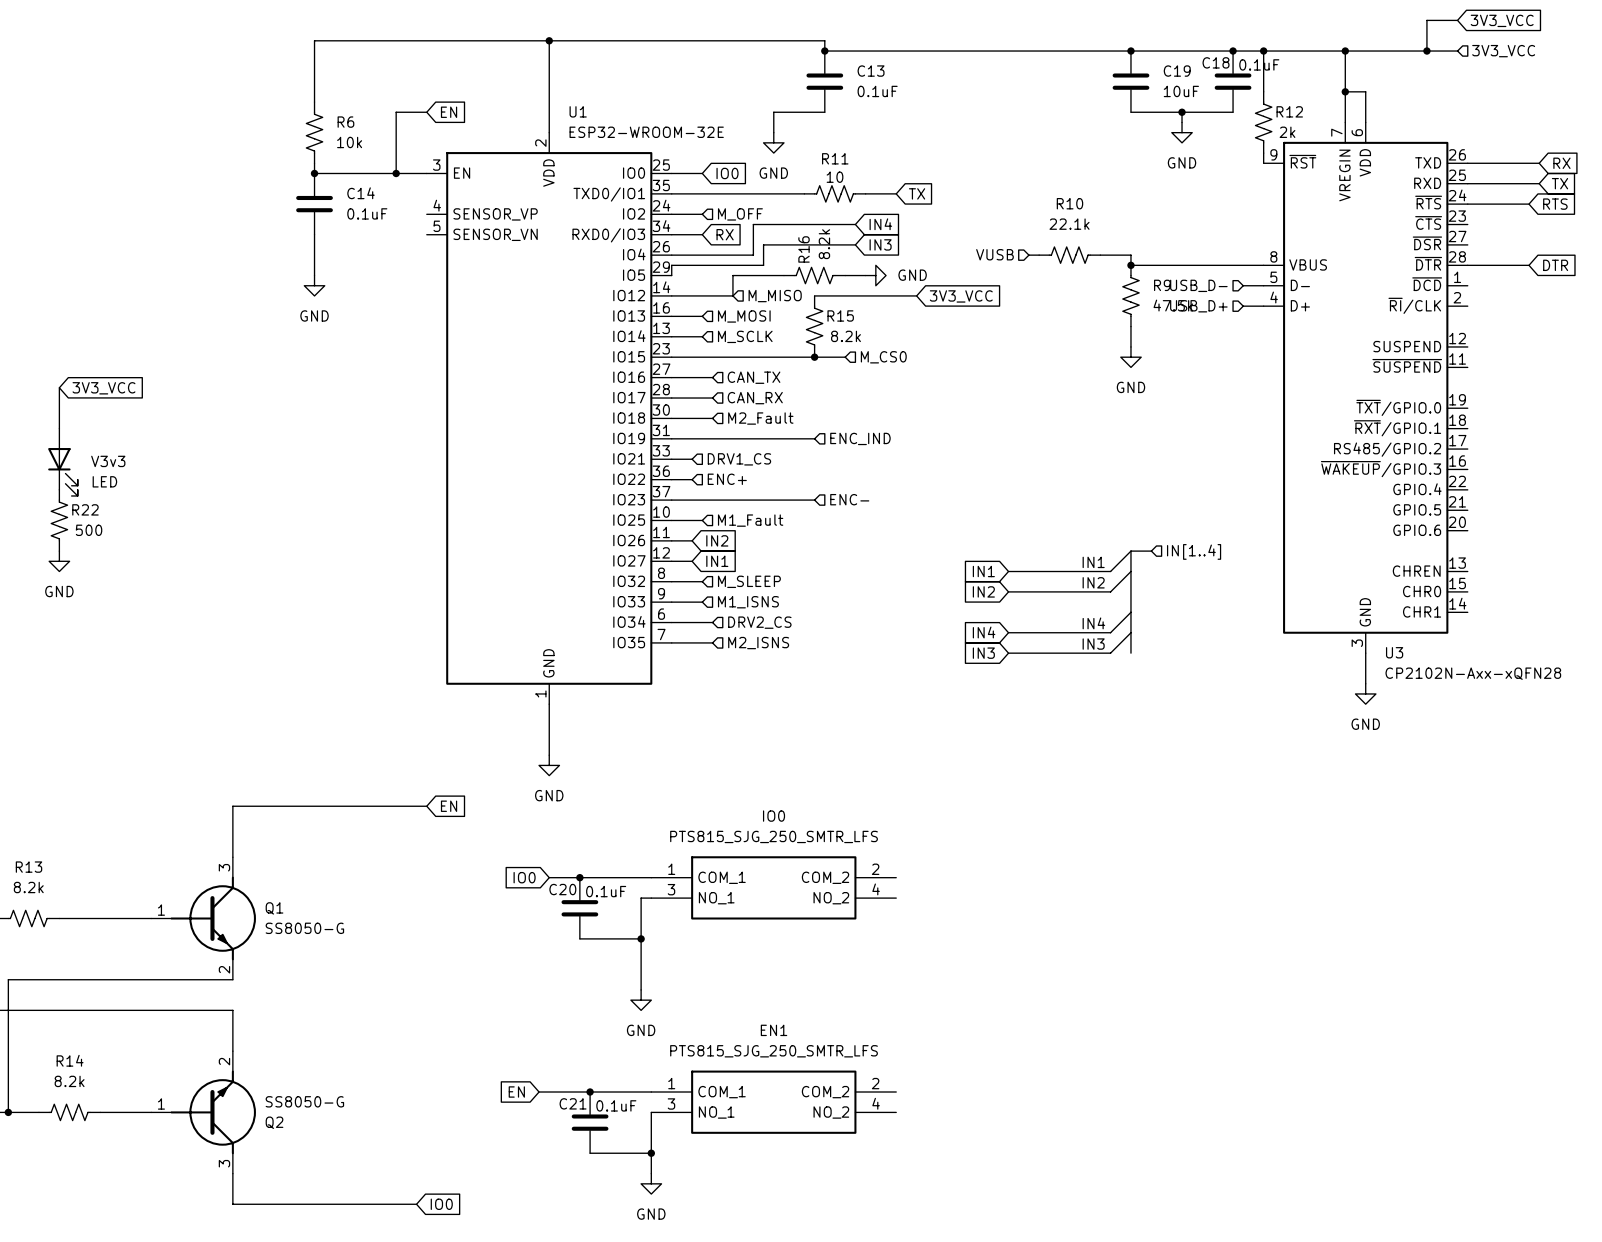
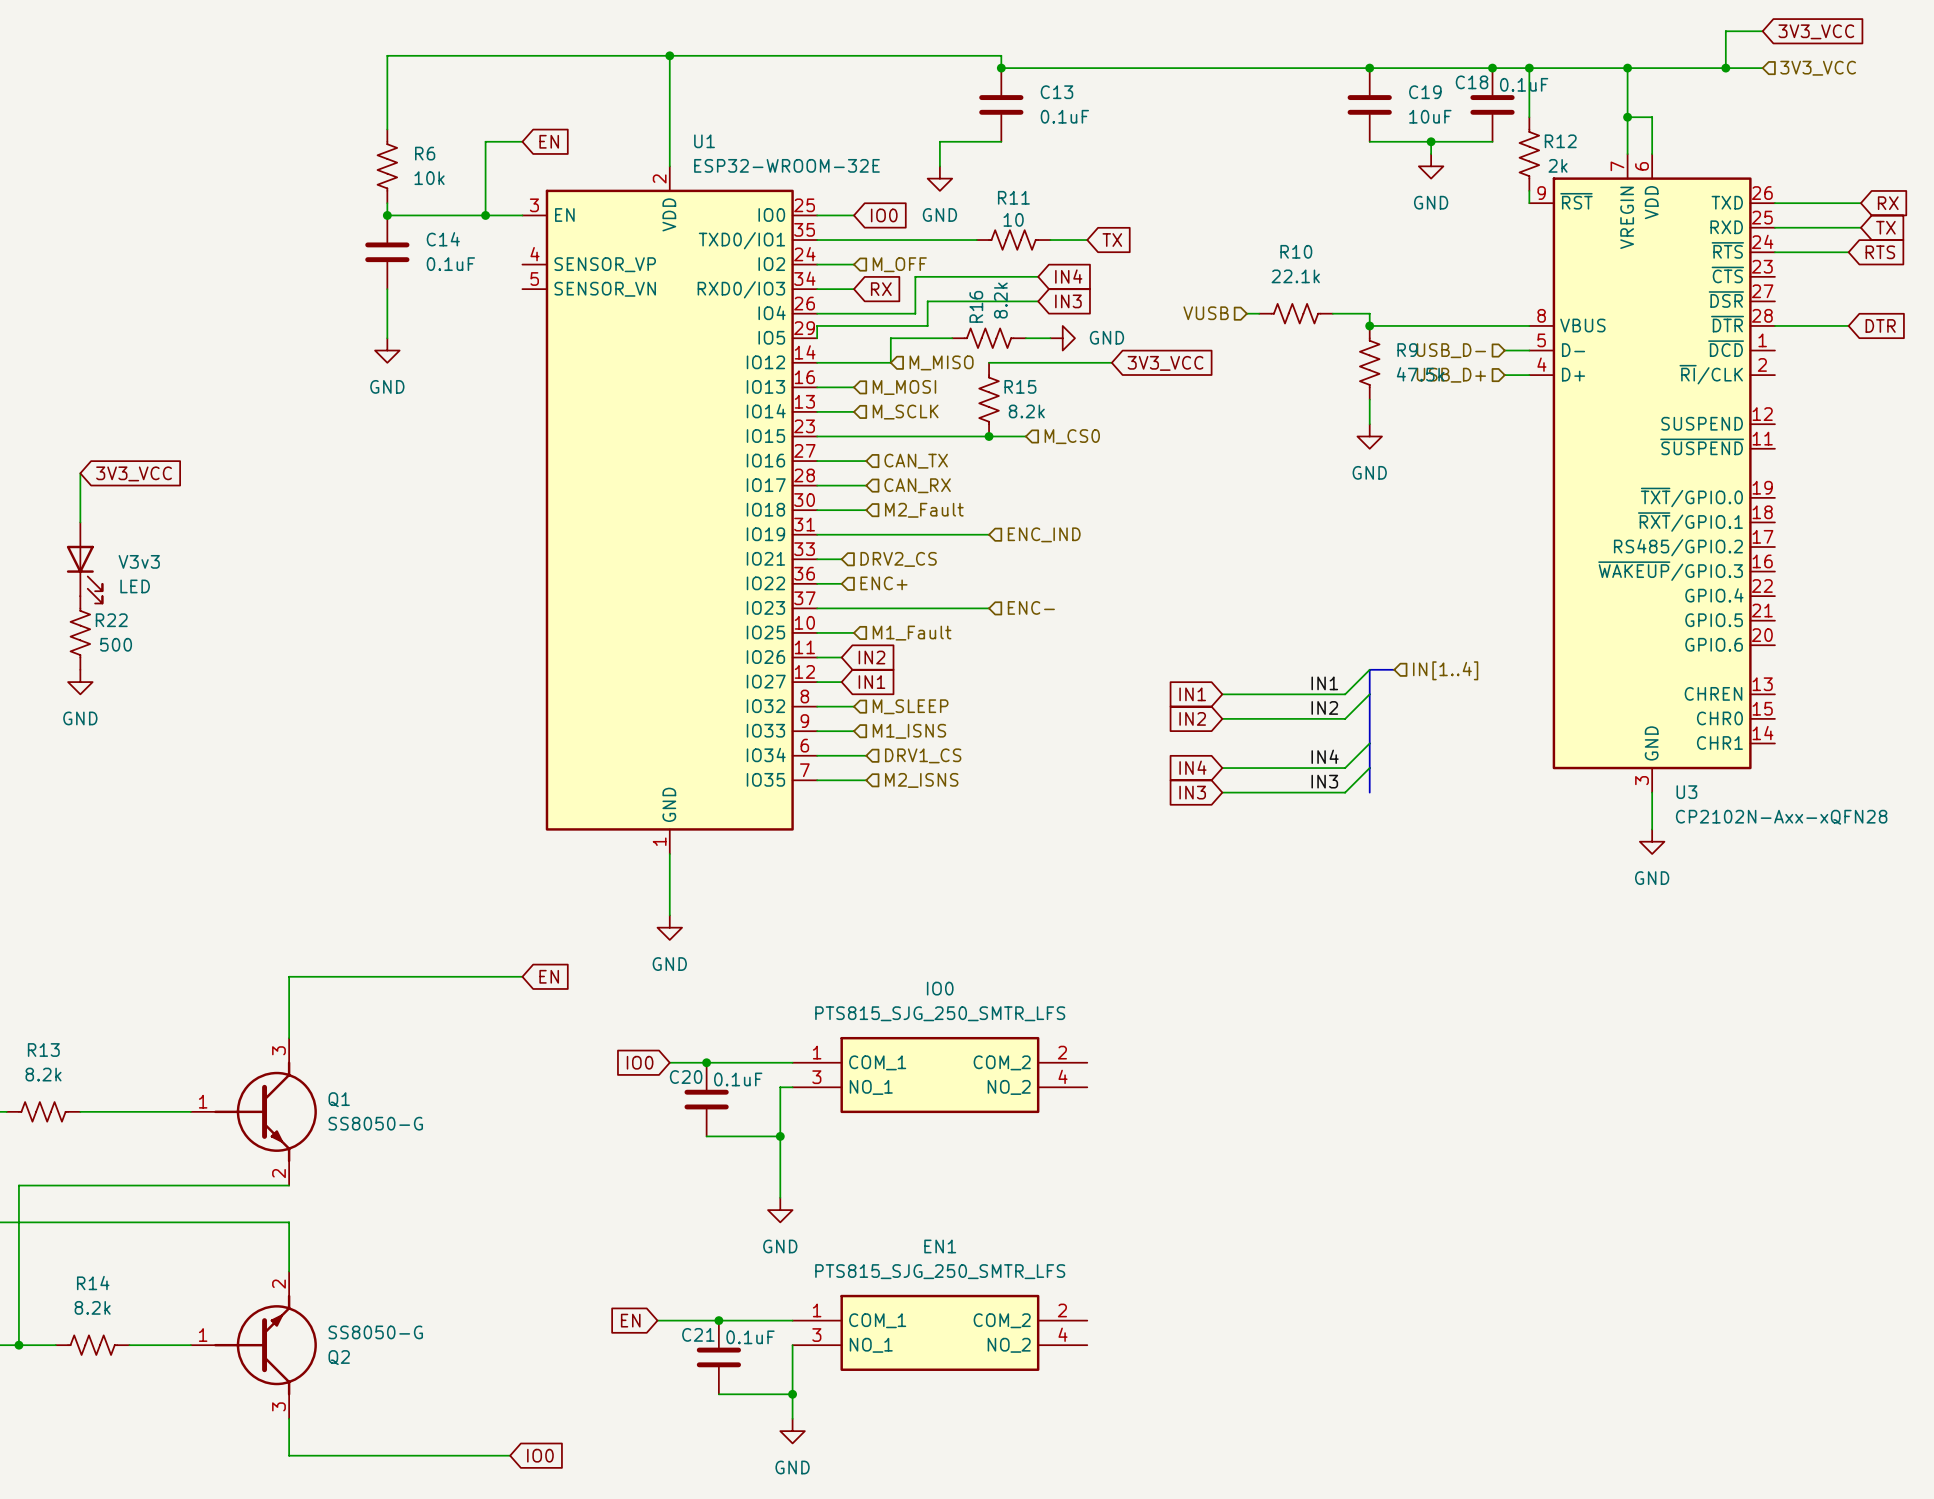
hierarchical label: DRV1_CS (739, 459) -> DRV2_CS (898, 559)
hierarchical label: DRV2_CS (759, 622) -> DRV1_CS (923, 755)

